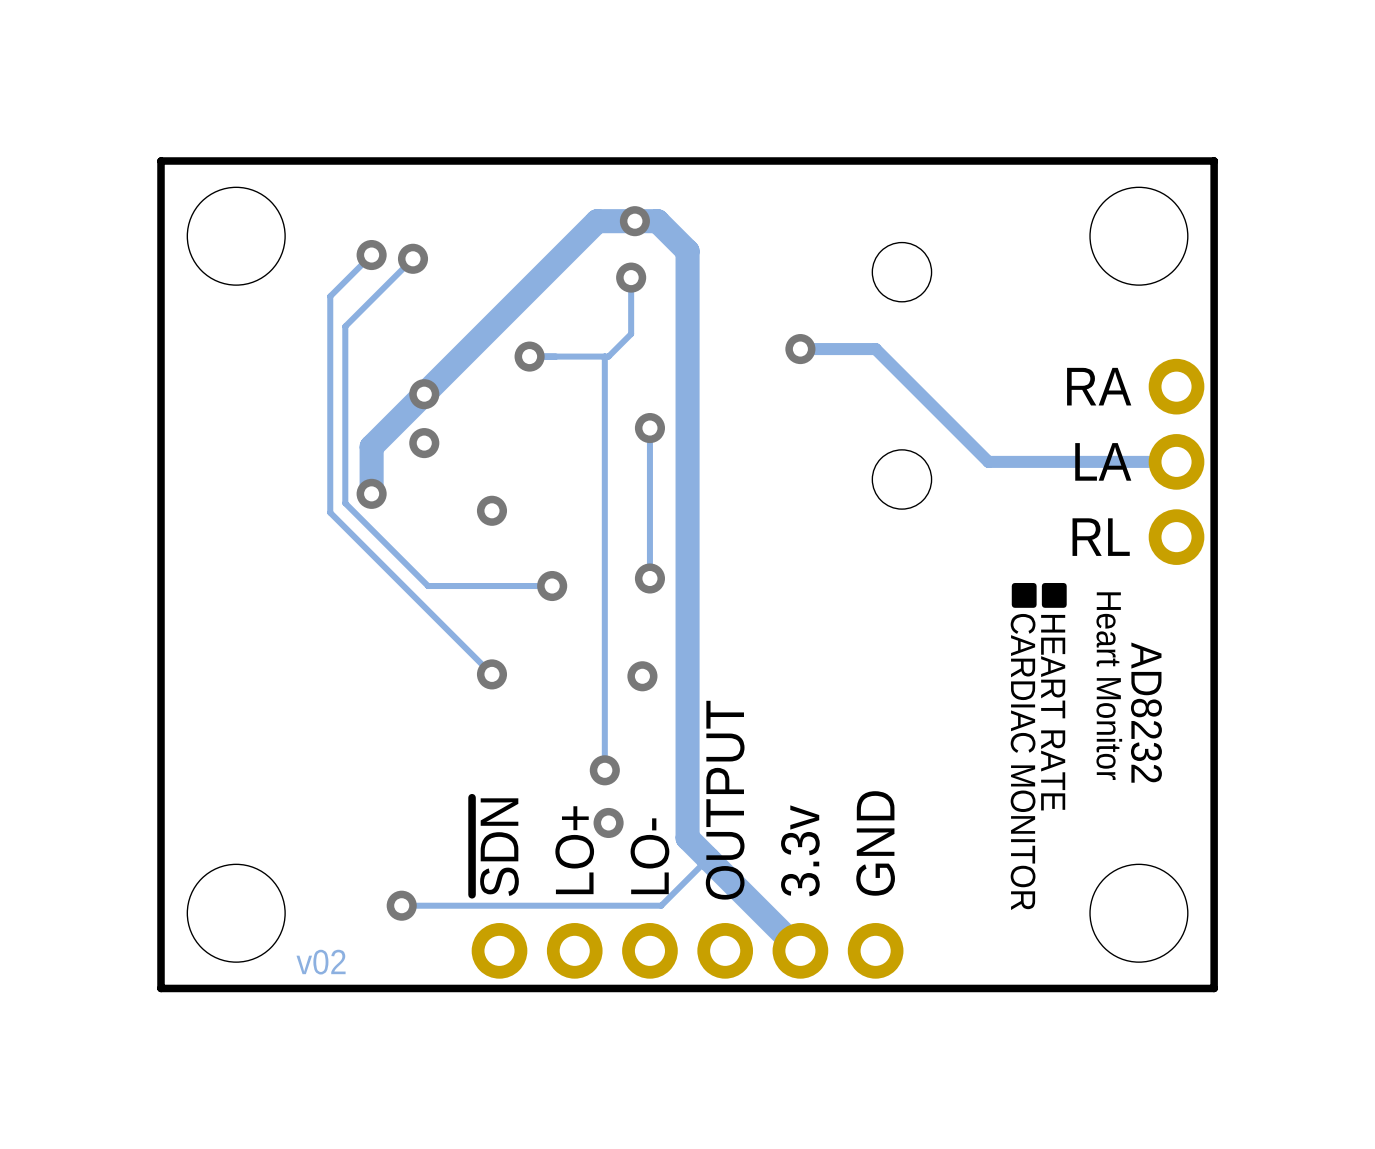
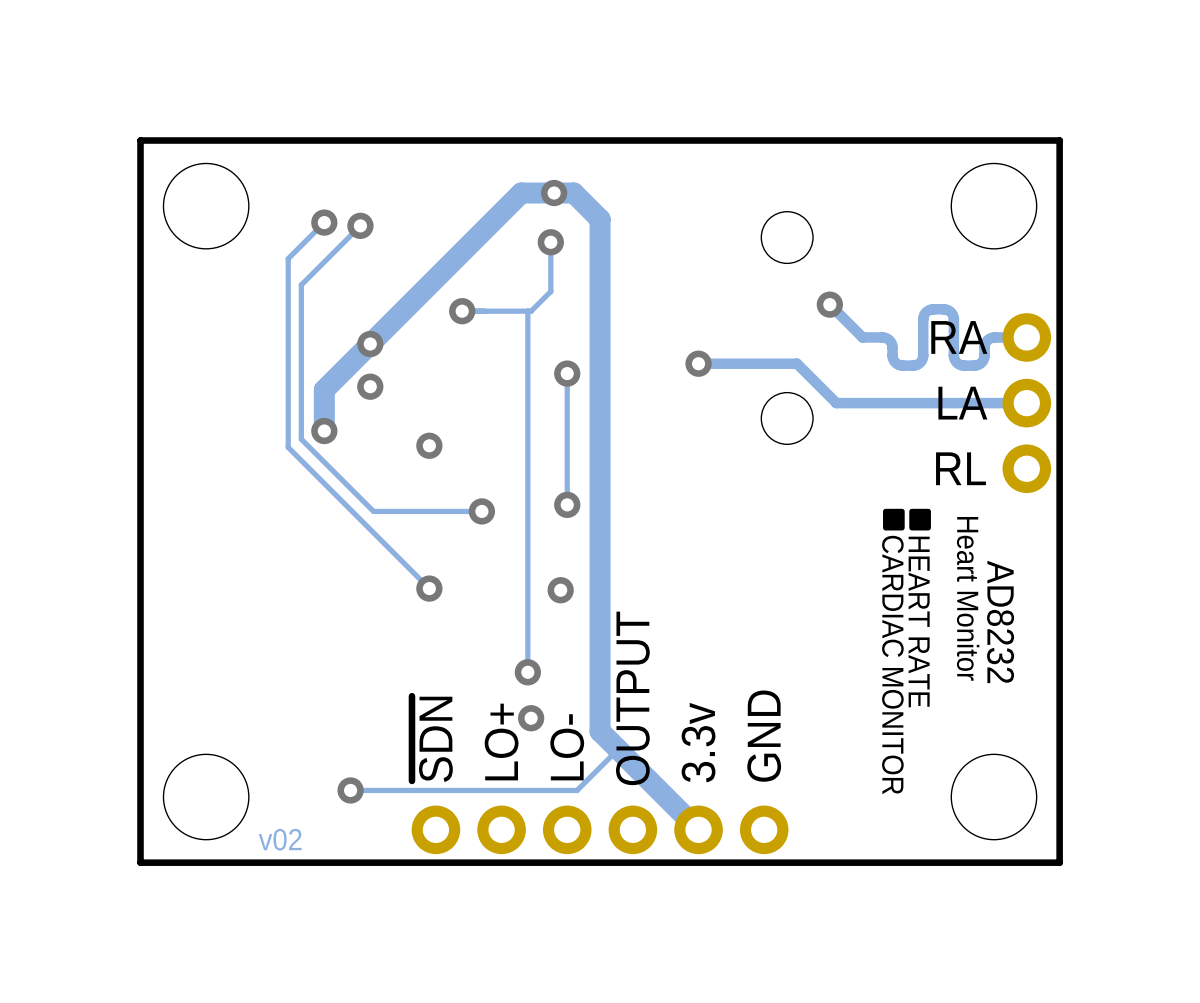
track: (800, 349) (875, 349) (988, 461) -> (698, 363) (797, 363) (836, 403) (862, 403)
via position: (800, 349) -> (698, 363)
track: none -> (829, 304) (862, 337) (883, 337) (888, 339) (892, 345) (893, 360) (901, 365) (915, 365) (921, 360) (923, 318) (926, 312) (930, 309) (946, 309) (952, 314) (953, 356) (956, 362) (961, 365) (975, 365) (981, 362) (984, 356) (985, 343) (990, 338) (1026, 337)
via: none -> (829, 304)

